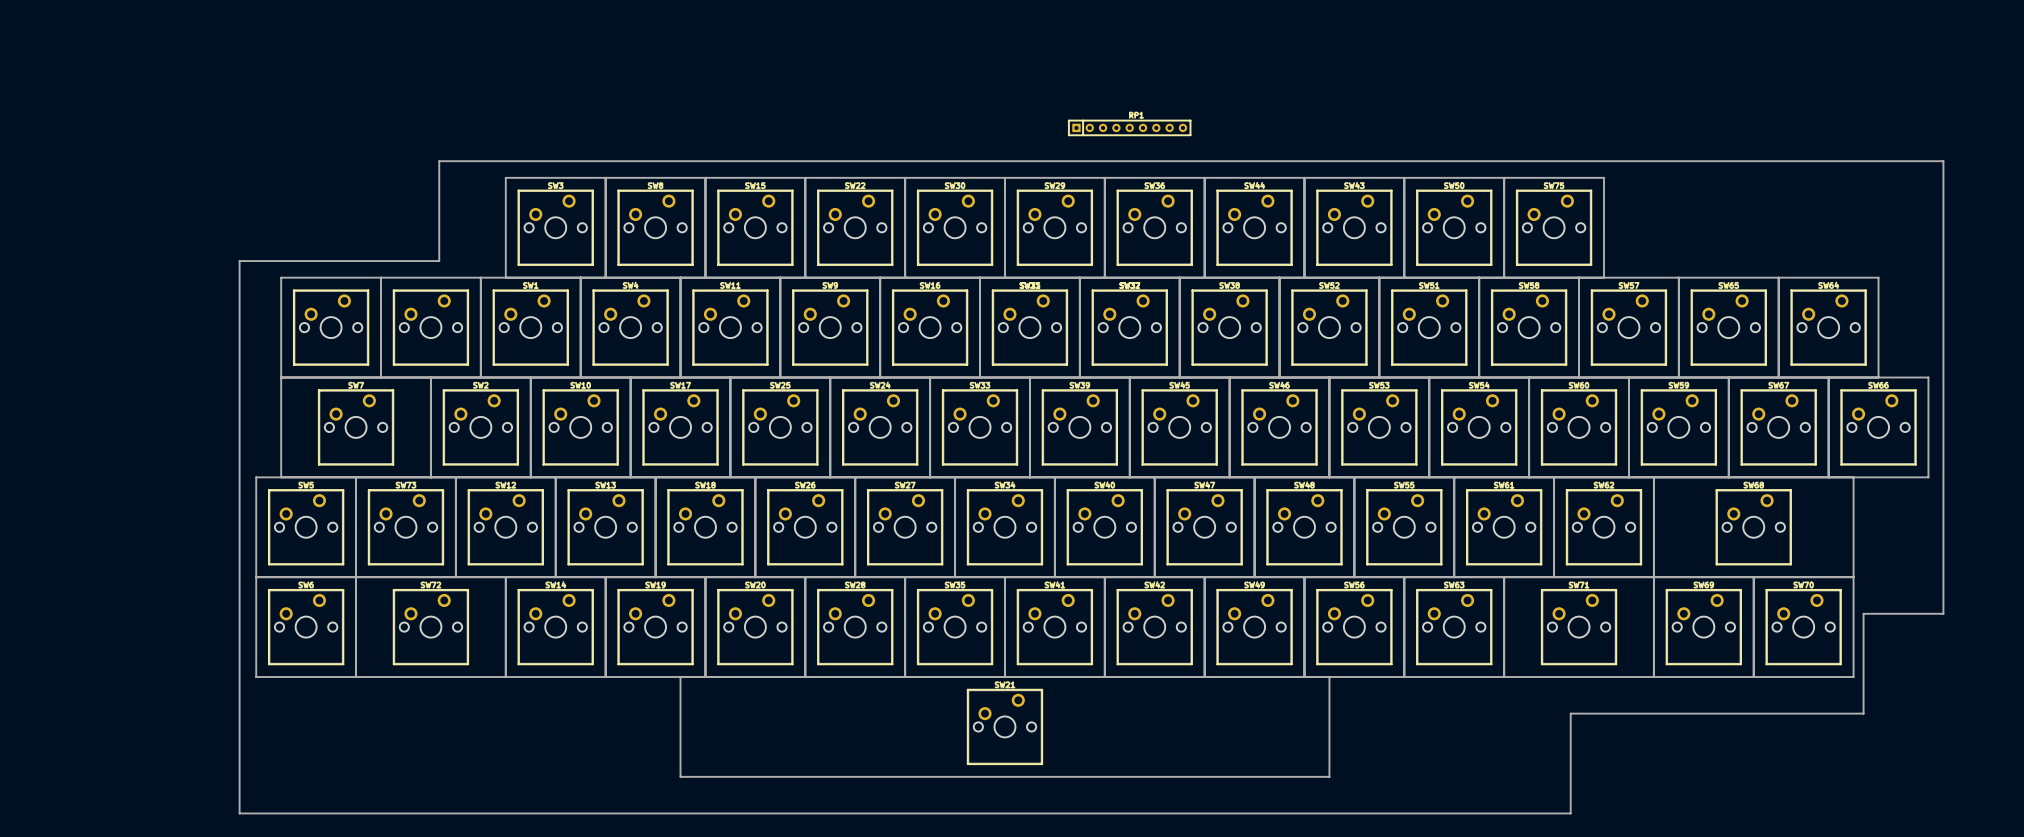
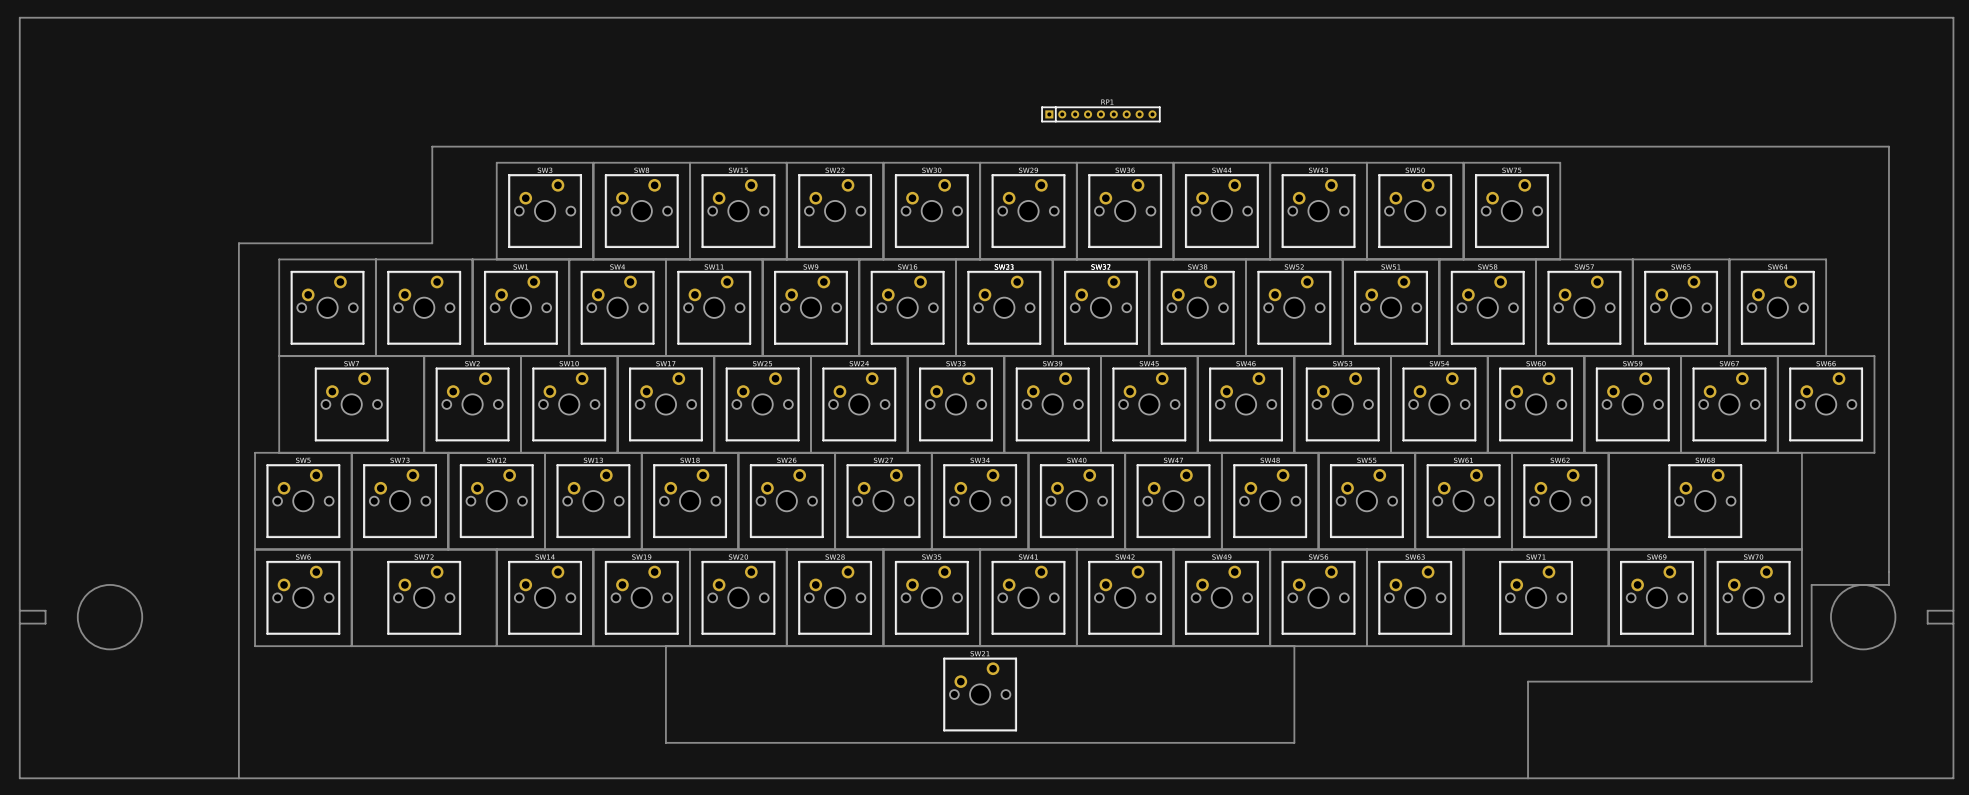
drawing: none -> [77, 584, 143, 650]
drawing: none -> [1830, 584, 1896, 650]
line: none -> (19, 610) (45, 610) (45, 623) (19, 623)
line: none -> (1953, 610) (1927, 610) (1927, 623) (1953, 623)
line: none -> (238, 778) (19, 778) (19, 17) (1953, 17) (1953, 778) (1528, 778)

